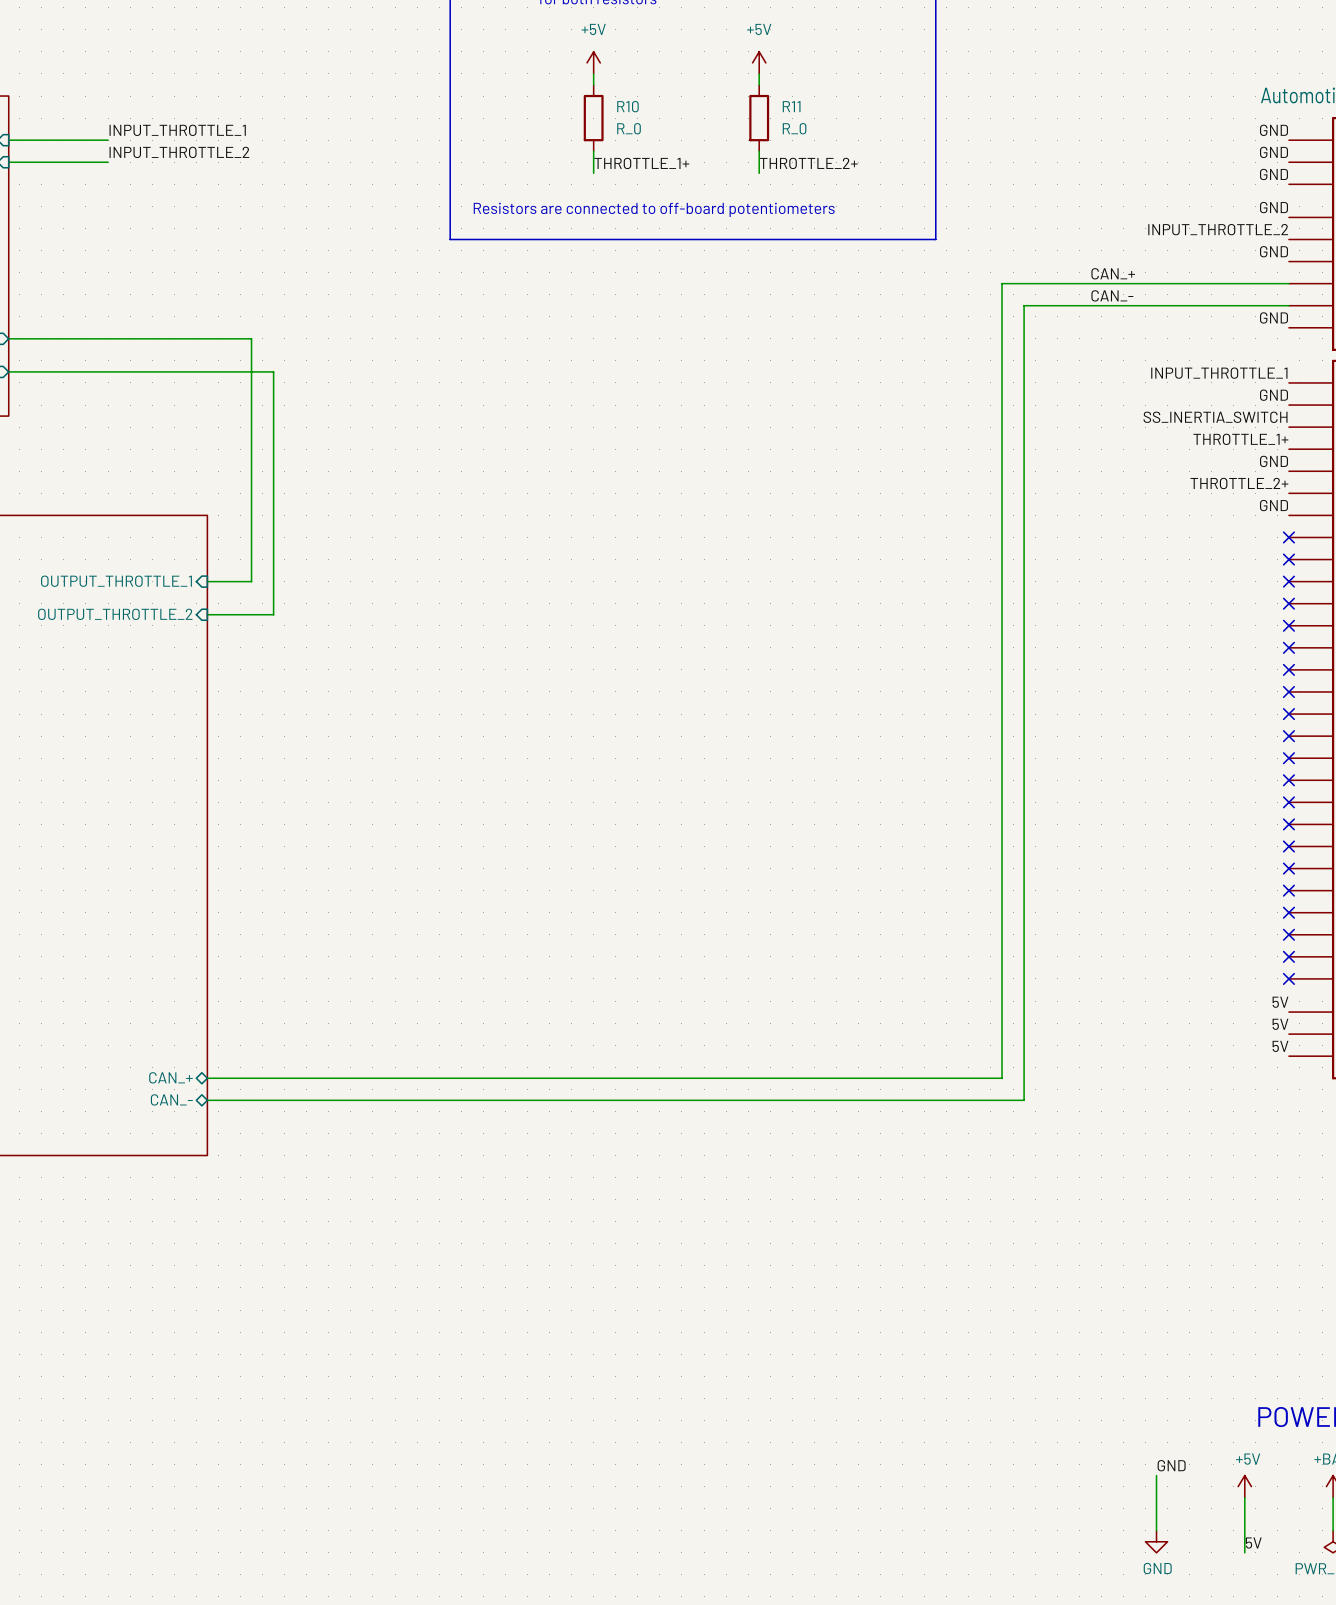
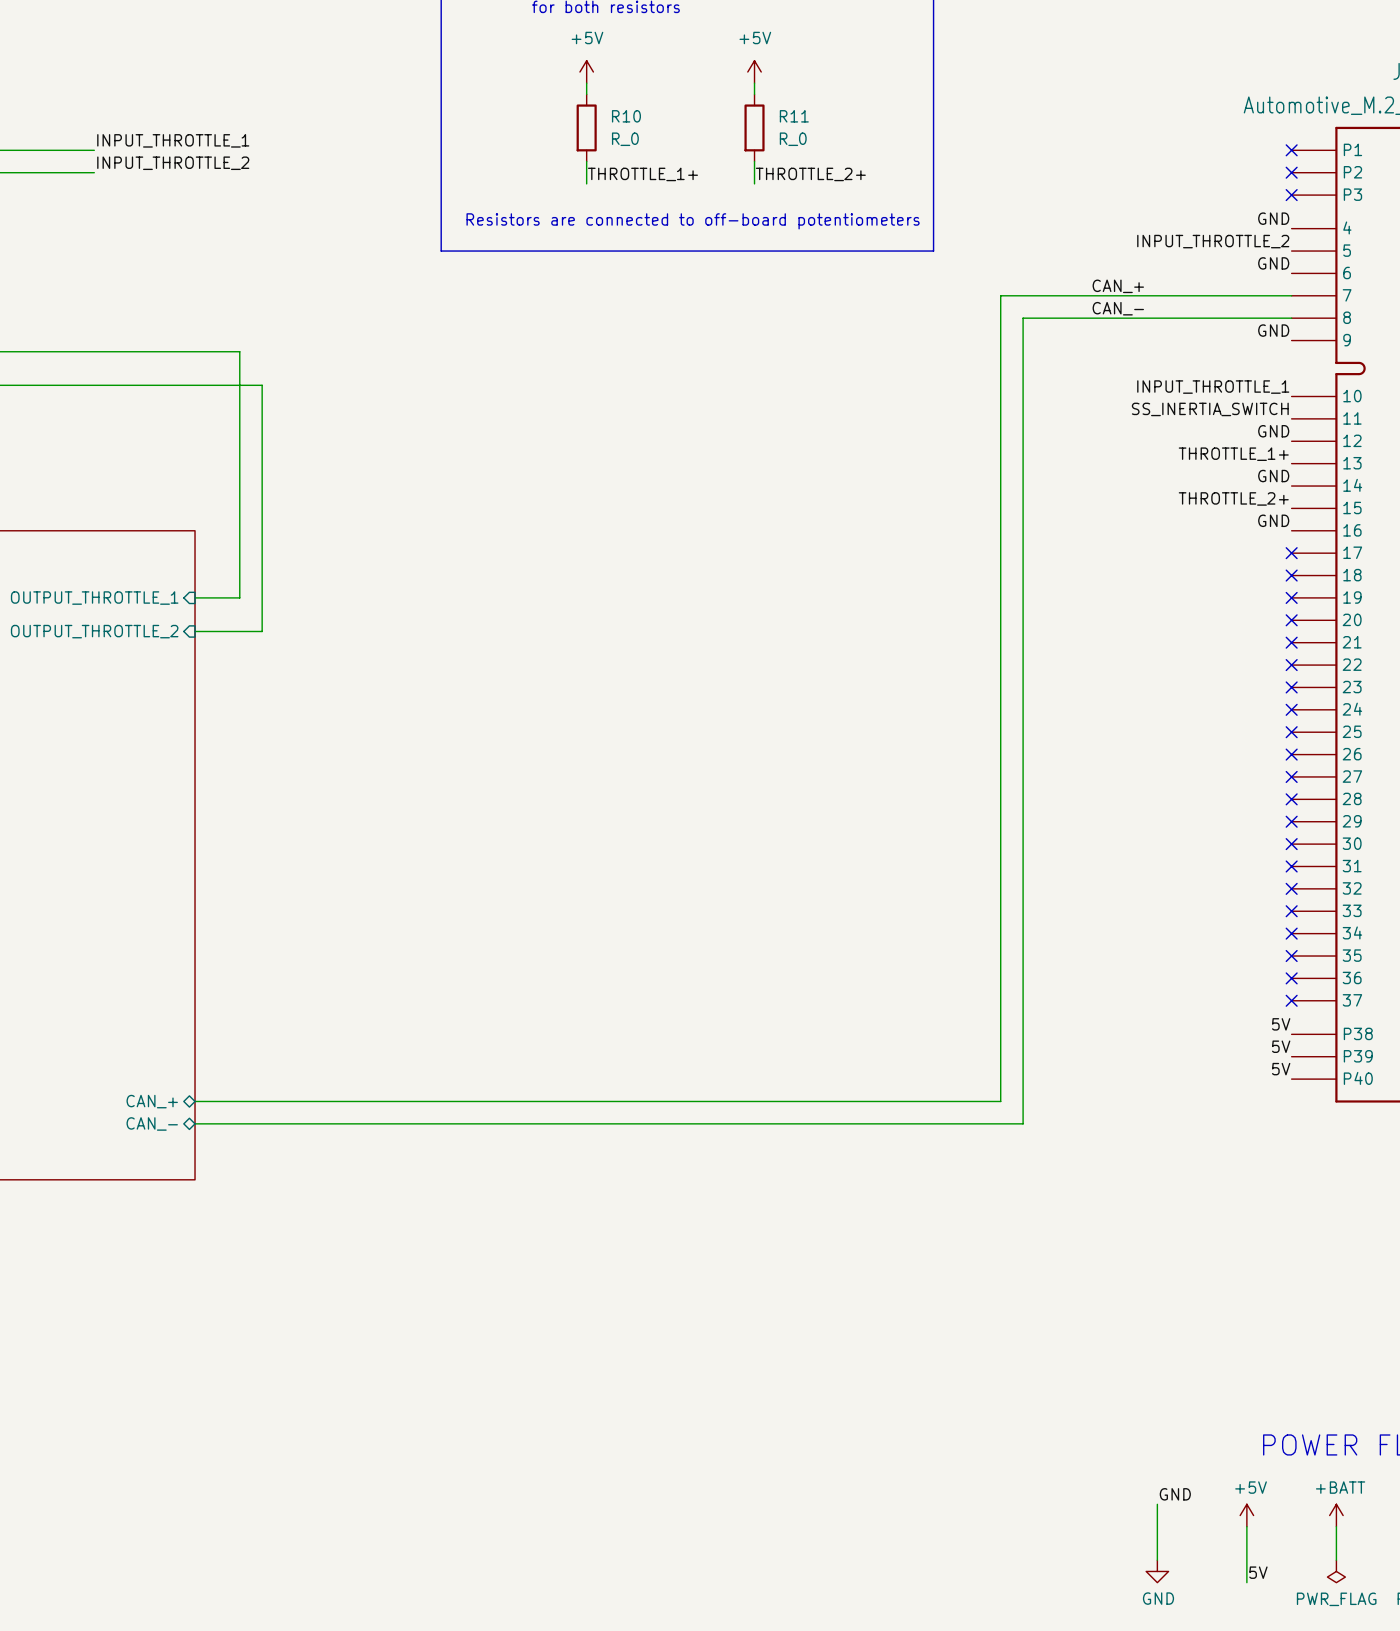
label: GND (1273, 130) -> none
no-connect mark: none -> (1291, 150)
label: GND (1273, 152) -> none
no-connect mark: none -> (1291, 172)
label: GND (1273, 174) -> none
no-connect mark: none -> (1291, 195)
label: GND (1273, 395) -> SS_INERTIA_SWITCH (1210, 409)
label: SS_INERTIA_SWITCH (1215, 417) -> GND (1273, 431)

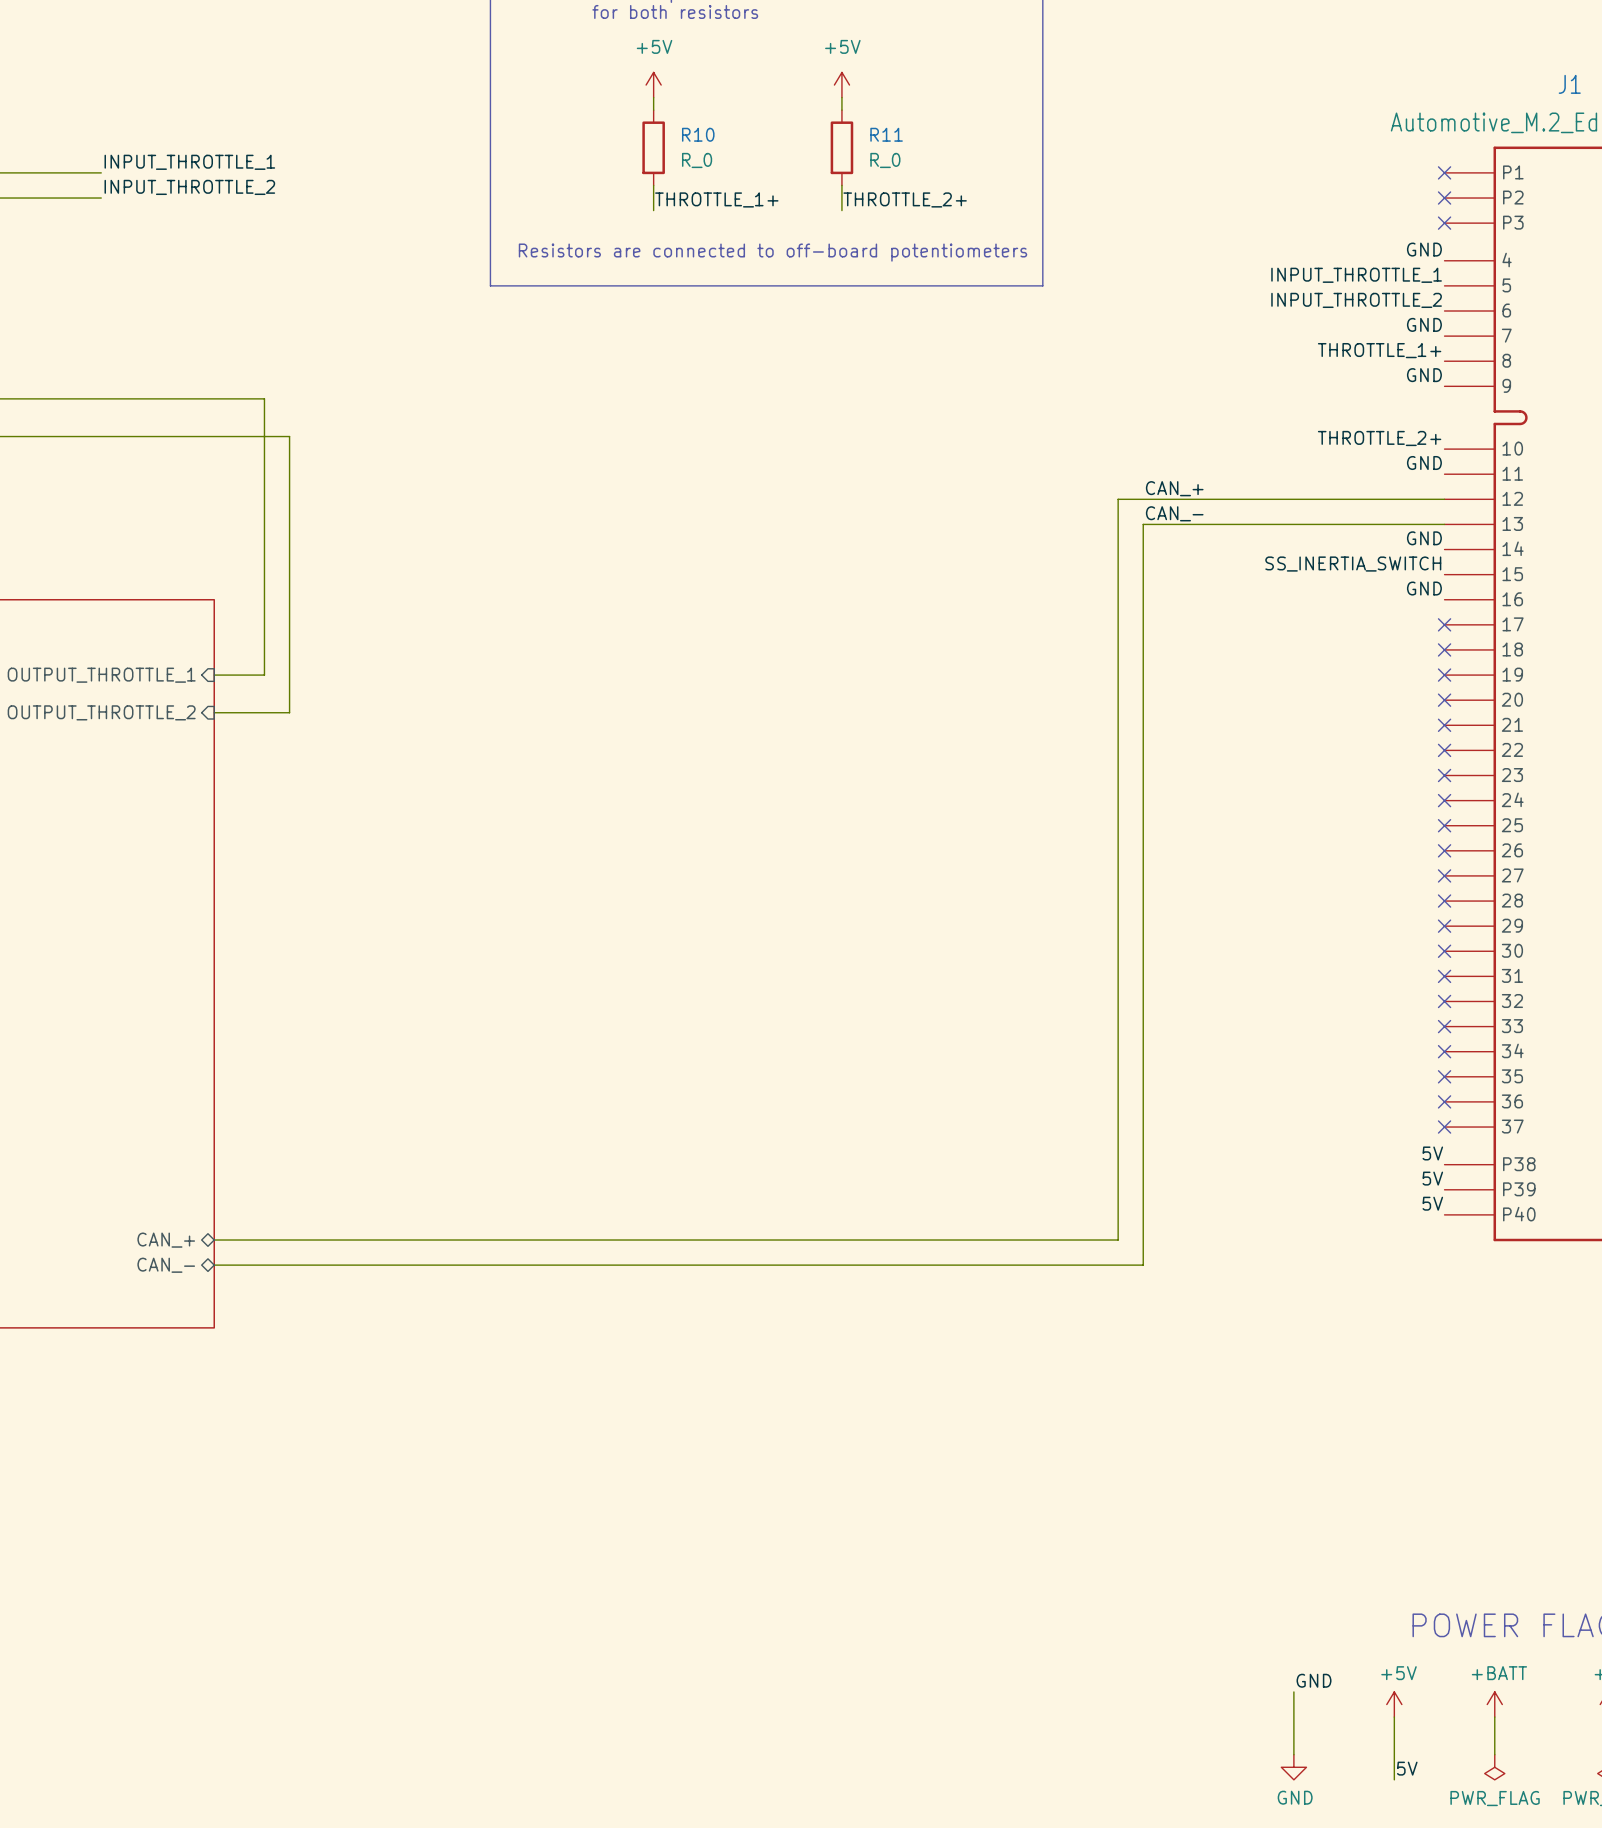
label: INPUT_THROTTLE_2 (1213, 241) -> INPUT_THROTTLE_1 (1356, 275)
label: GND (1273, 263) -> INPUT_THROTTLE_2 (1356, 300)
label position: CAN_+ (1118, 286) -> CAN_+ (1174, 488)
wire: (1291, 295) (1000, 295) (1000, 441) -> (1444, 499) (1118, 499)
label position: CAN_- (1118, 308) -> CAN_- (1174, 513)
wire: (1291, 318) (1023, 318) (1023, 463) -> (1444, 524) (1143, 524)
label: INPUT_THROTTLE_1 (1213, 387) -> THROTTLE_2+ (1379, 438)
label: SS_INERTIA_SWITCH (1210, 409) -> GND (1424, 463)
label position: GND (1273, 431) -> GND (1424, 324)
label position: THROTTLE_1+ (1233, 454) -> THROTTLE_1+ (1379, 350)
label: THROTTLE_2+ (1233, 498) -> SS_INERTIA_SWITCH (1353, 564)

